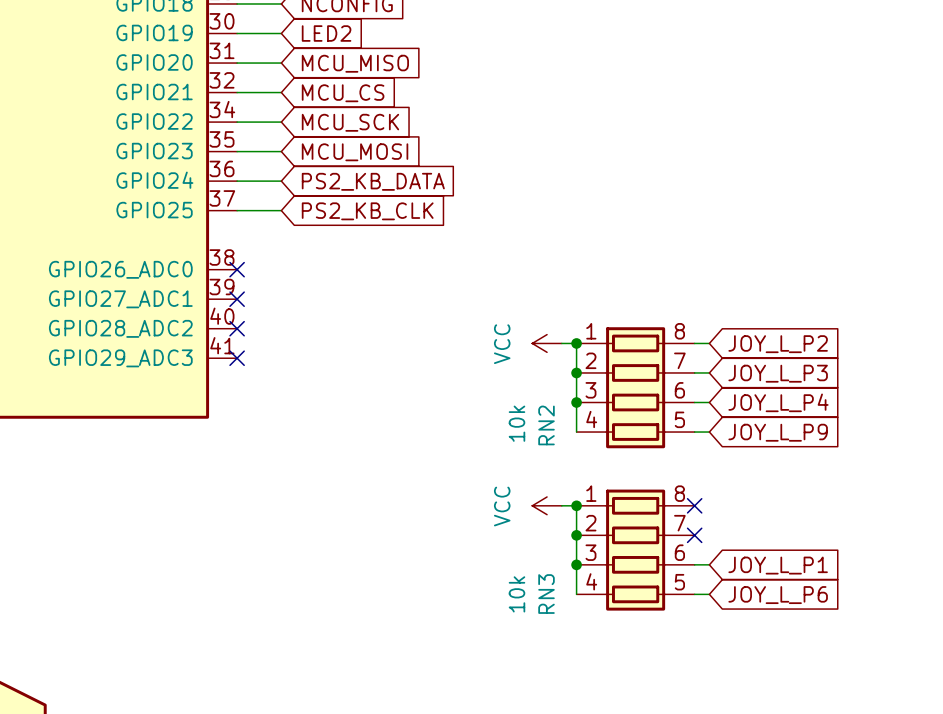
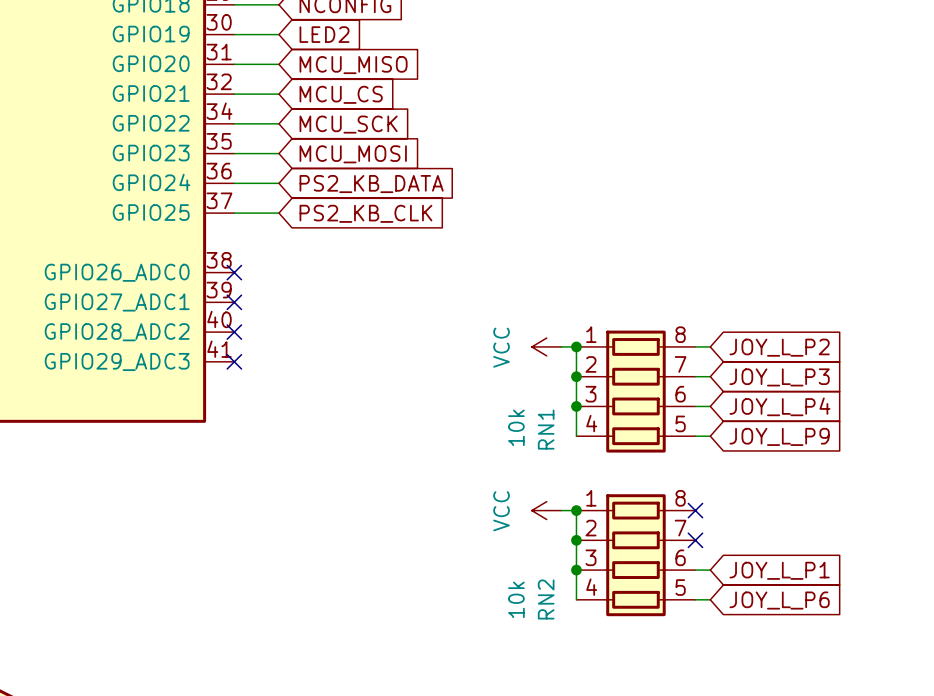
RN2 name: RN2 (546, 425) -> RN1 (546, 429)
RN3 name: RN3 (546, 594) -> RN2 (546, 599)

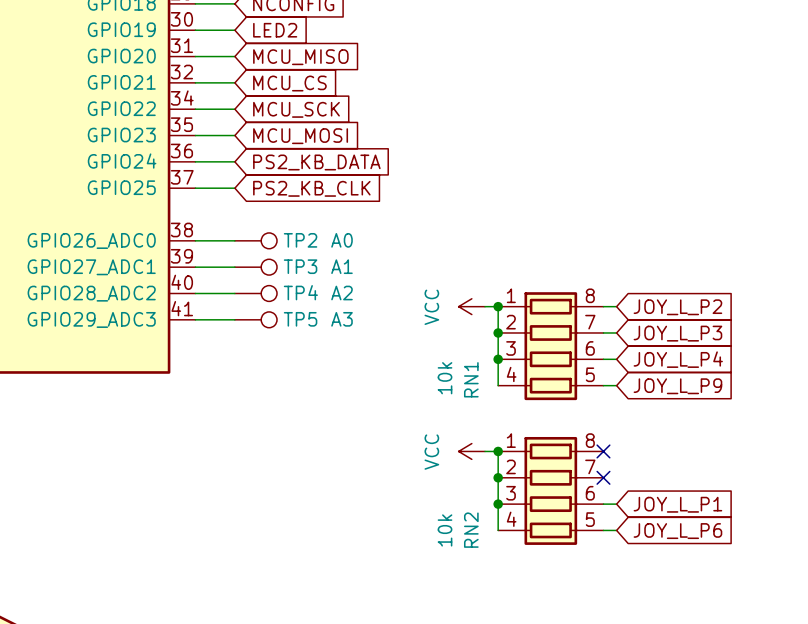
wire: none -> (195, 240) (234, 240)
no-connect mark: (234, 272) -> none
TP2: none -> A0 (255, 240)
wire: none -> (195, 267) (234, 267)
no-connect mark: (234, 302) -> none
TP3: none -> A1 (255, 267)
wire: none -> (195, 293) (234, 293)
no-connect mark: (234, 332) -> none
TP4: none -> A2 (255, 293)
wire: none -> (195, 319) (234, 319)
no-connect mark: (234, 361) -> none
TP5: none -> A3 (255, 319)

